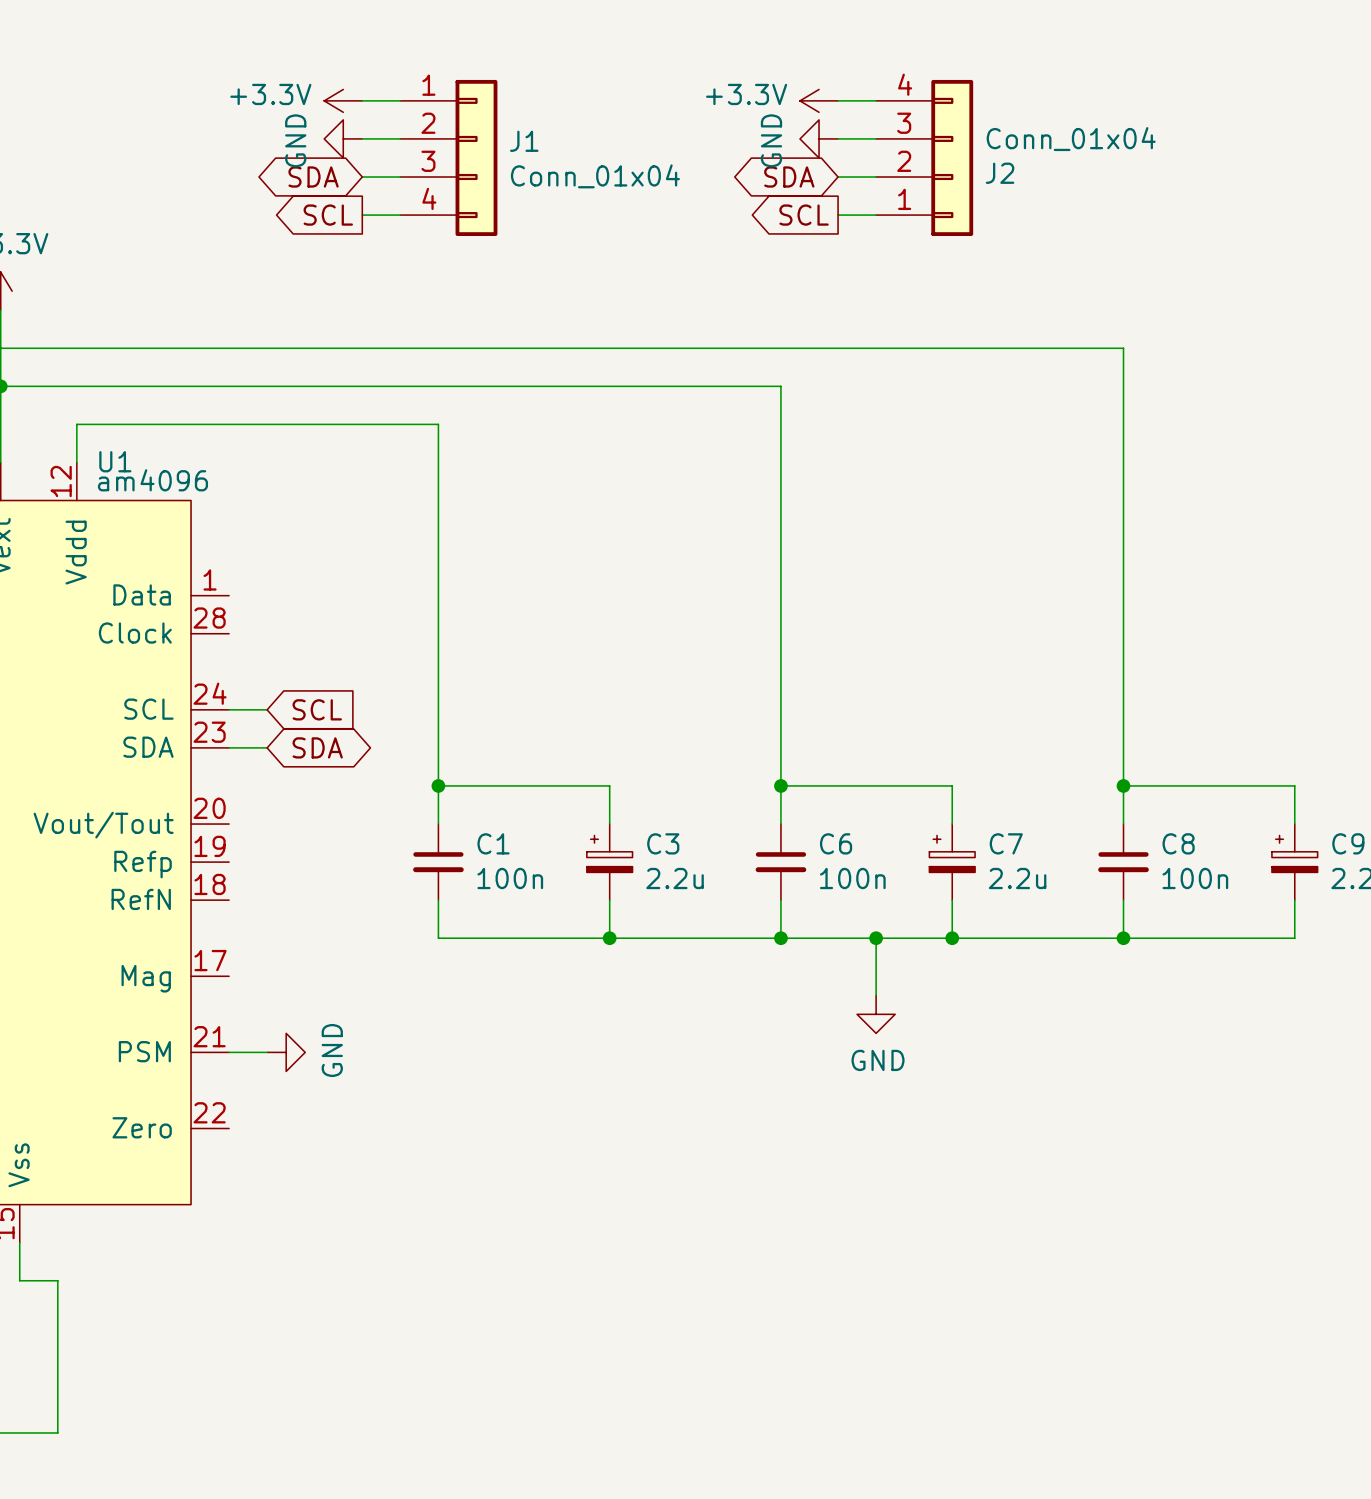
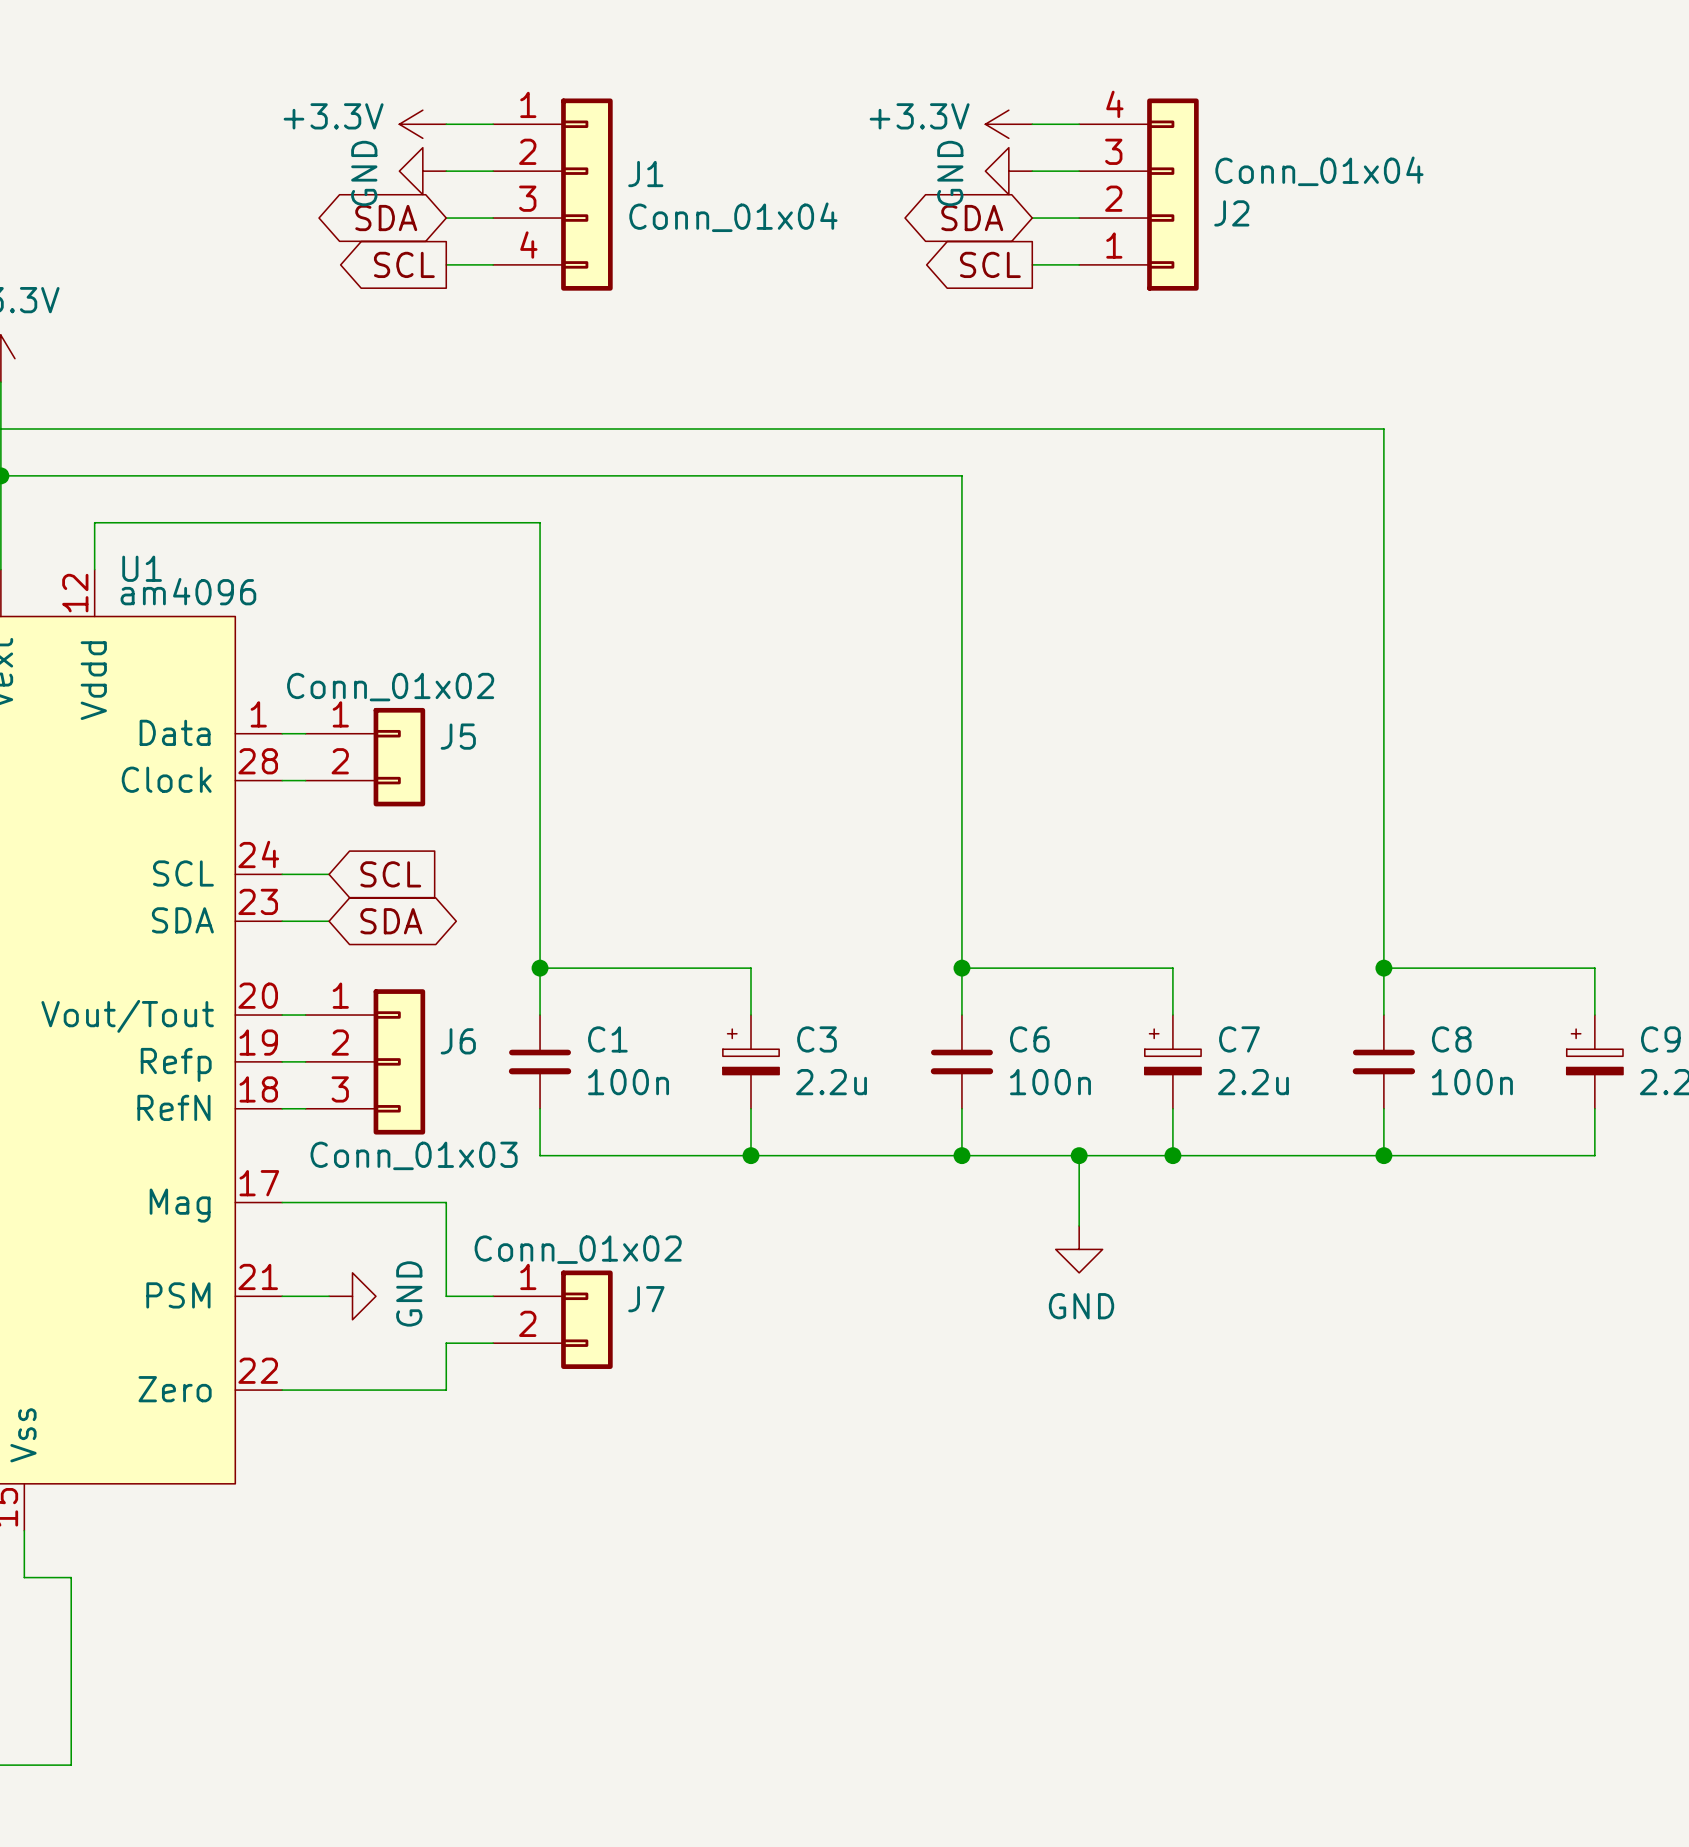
wire: none -> (282, 733) (305, 733)
J5: none -> Conn_01x02 (365, 757)
wire: none -> (282, 780) (305, 780)
wire: none -> (282, 1015) (305, 1015)
wire: none -> (282, 1061) (305, 1061)
J6: none -> Conn_01x03 (365, 1061)
wire: none -> (282, 1108) (305, 1108)
wire: none -> (282, 1202) (446, 1202) (446, 1296) (493, 1296)
J7: none -> Conn_01x02 (552, 1319)
wire: none -> (493, 1343) (446, 1343) (446, 1390) (282, 1390)

